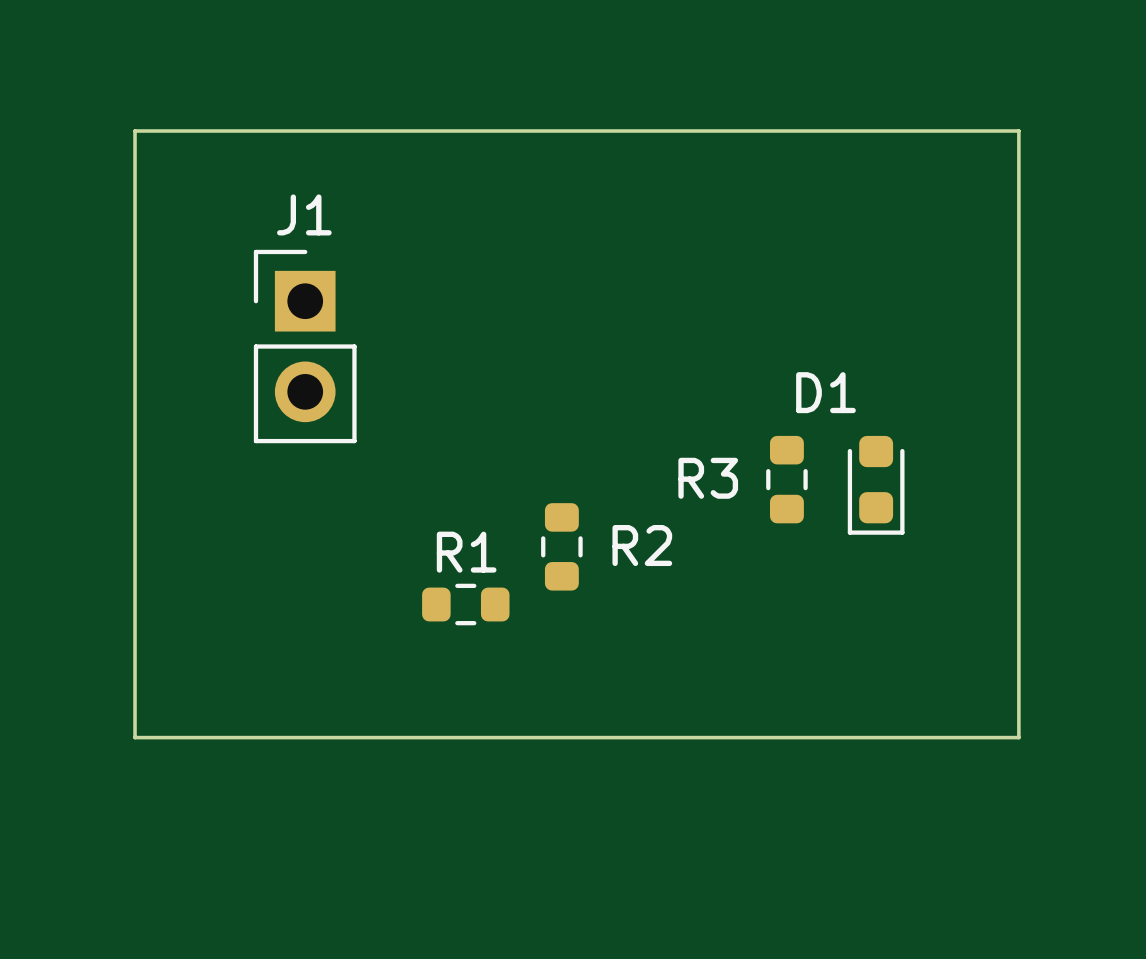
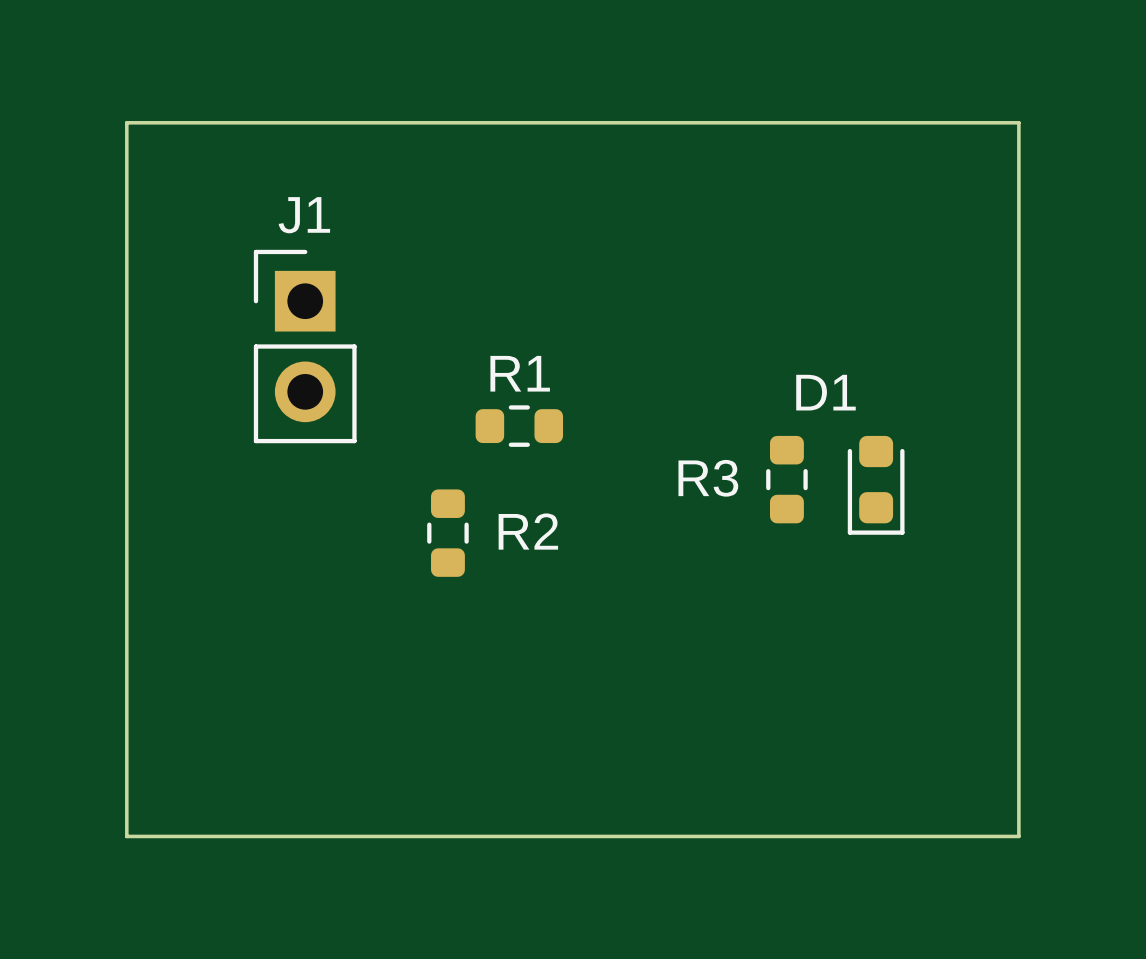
board edge: (1018, 131) (135, 131) (135, 737) (1018, 737) -> (1018, 131) (1018, 122) (126, 122) (126, 836) (1018, 836) (1018, 737)
R2 position: (561, 546) -> (447, 533)
R1 position: (465, 604) -> (519, 426)

